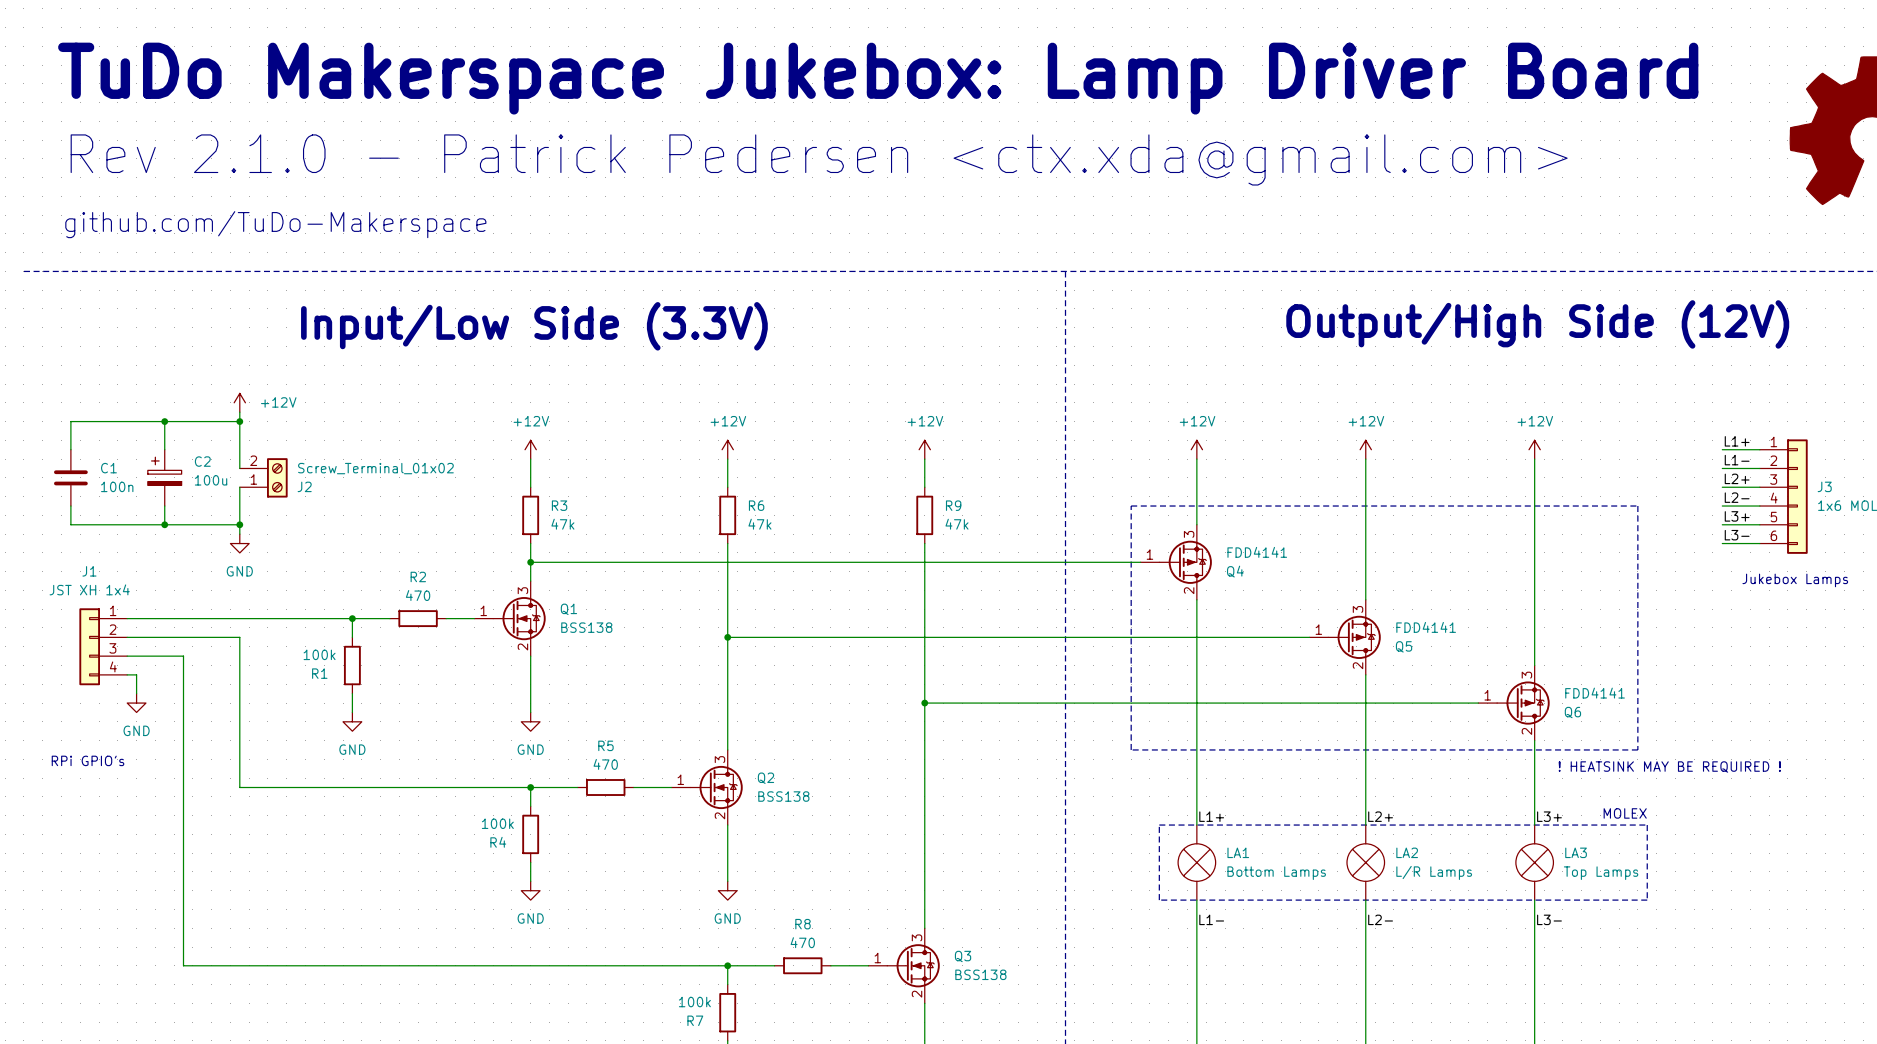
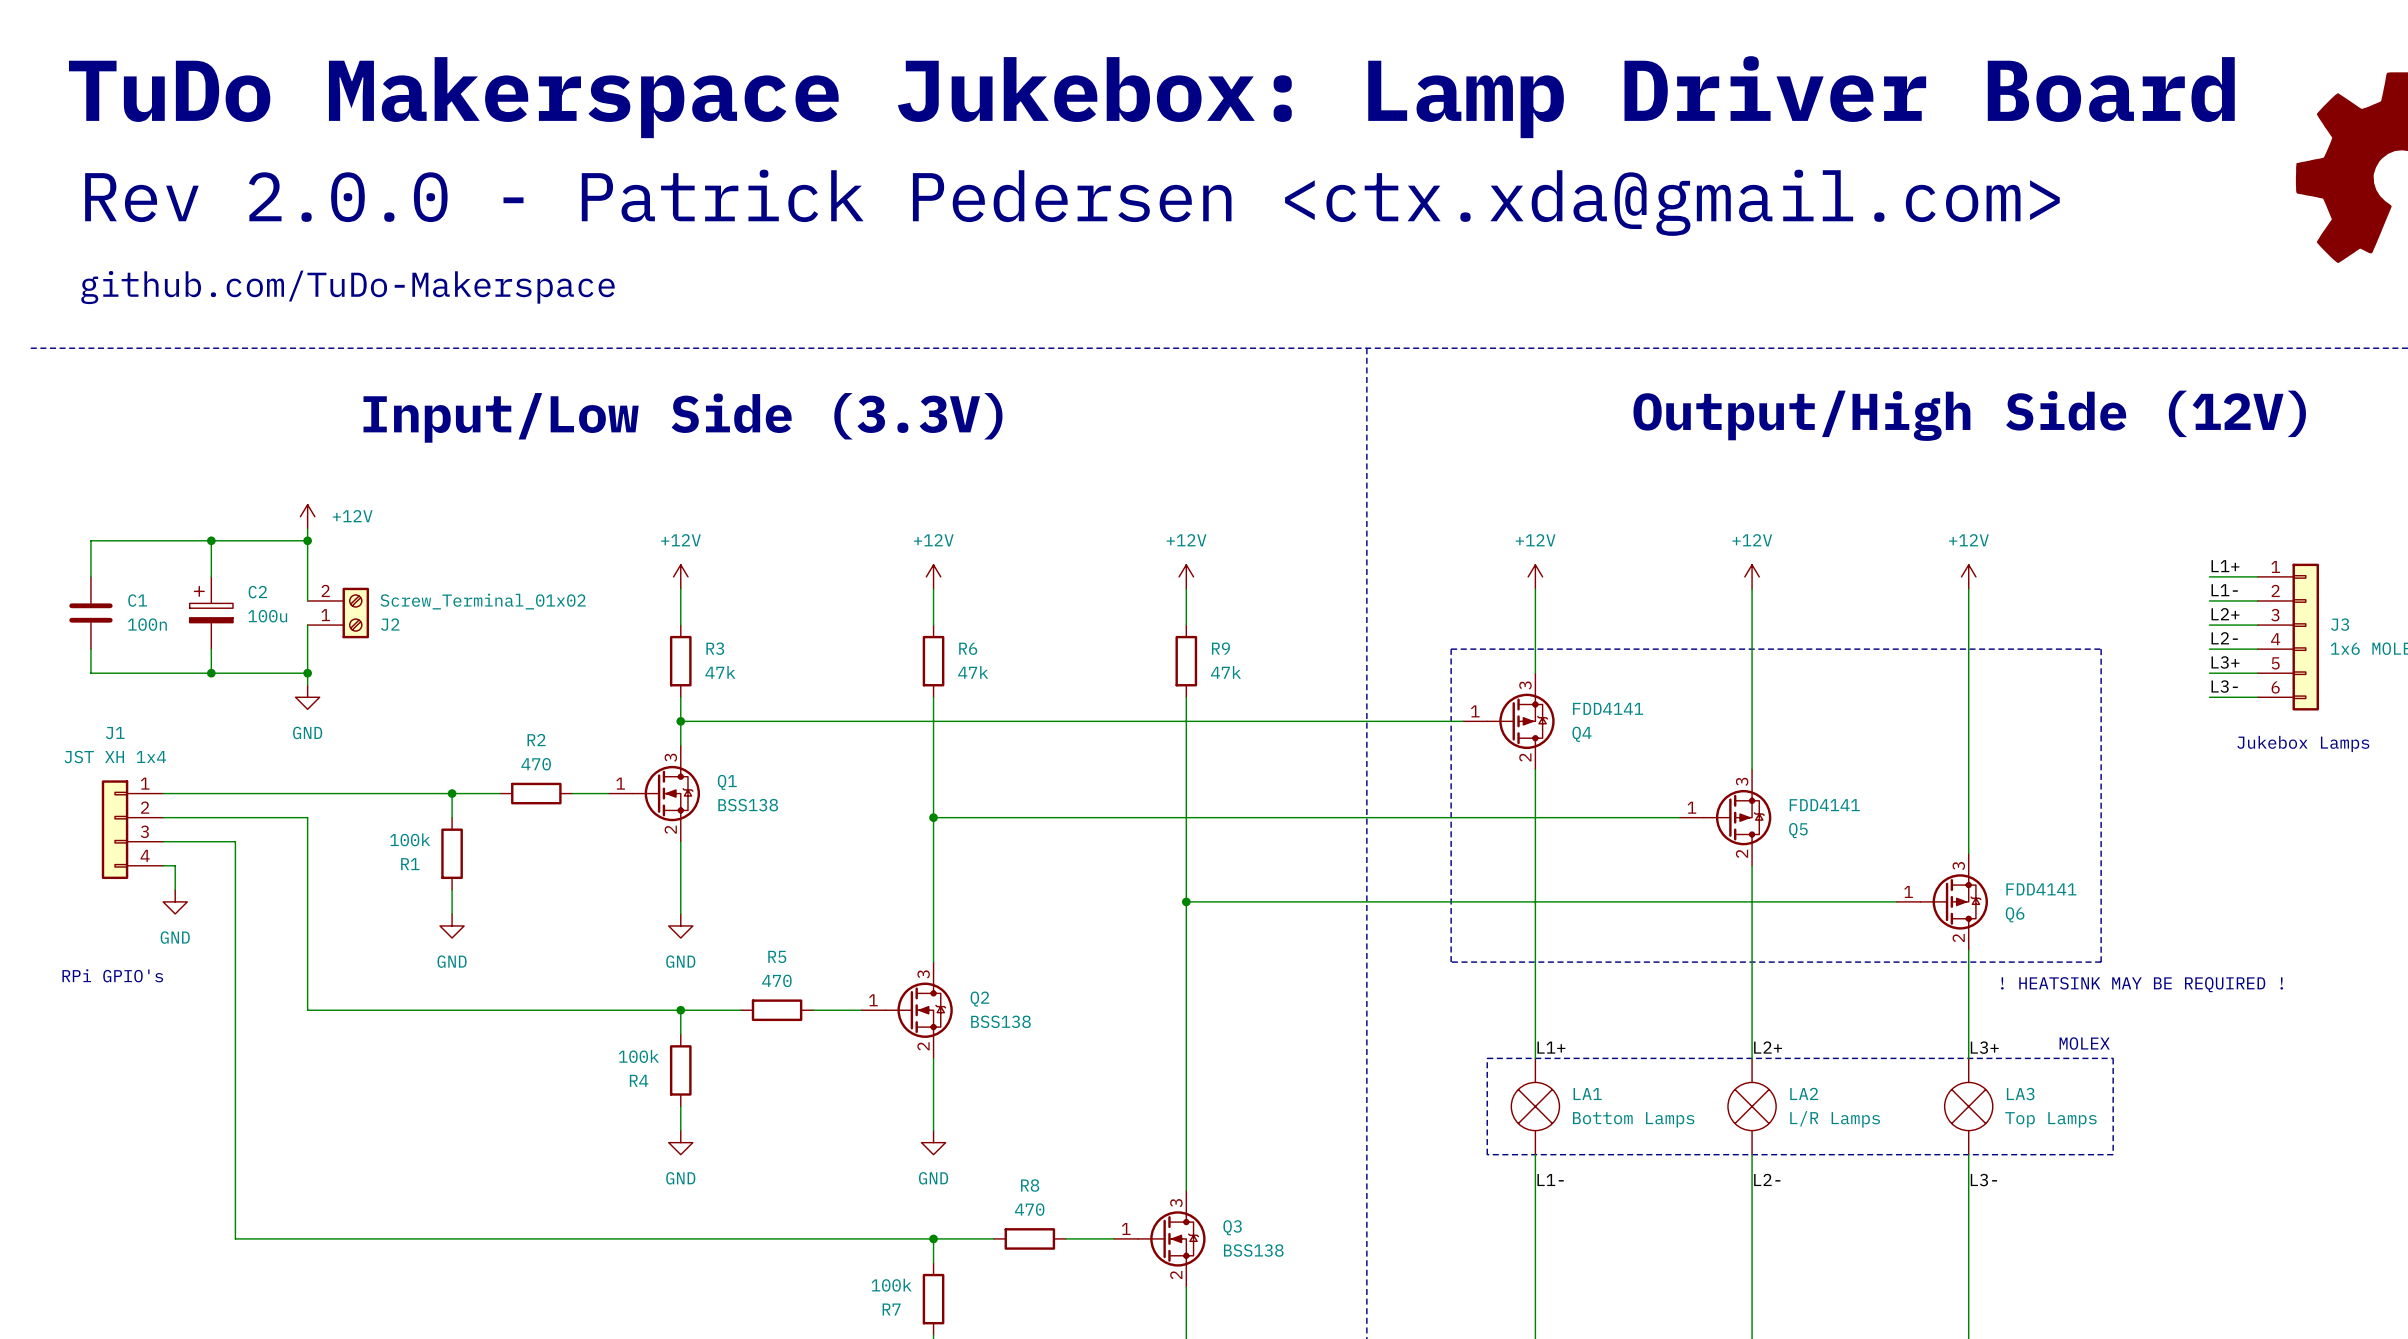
text: Rev 2.1.0 - Patrick Pedersen <ctx.xda@gmail.com> (819, 159) -> Rev 2.0.0 - Patrick Pedersen <ctx.xda@gmail.com> (1072, 202)

